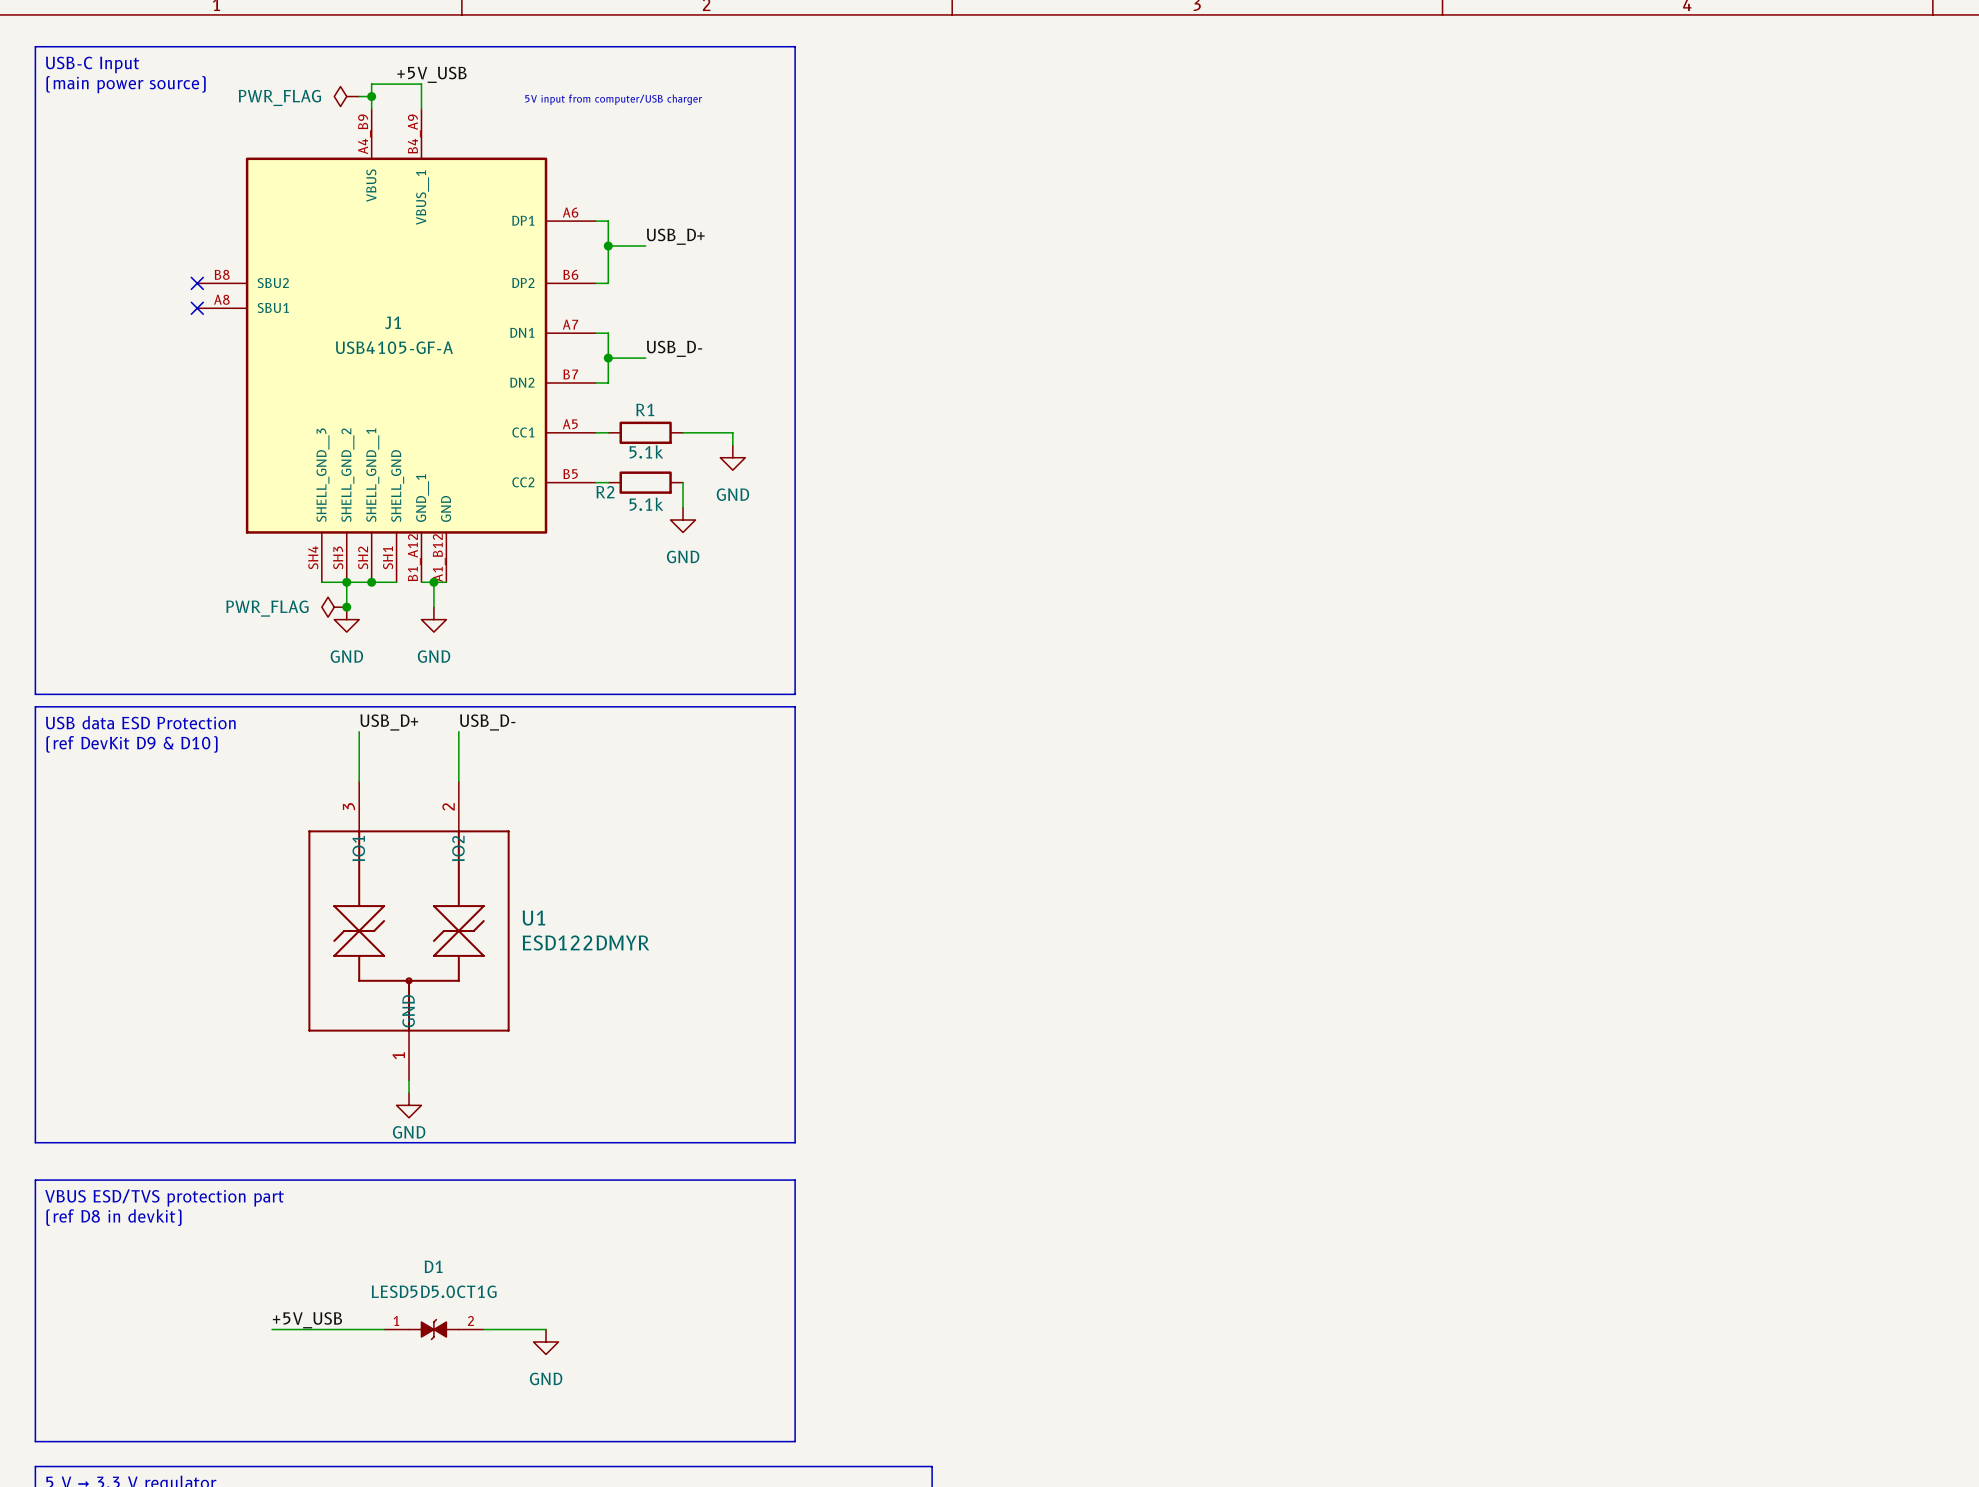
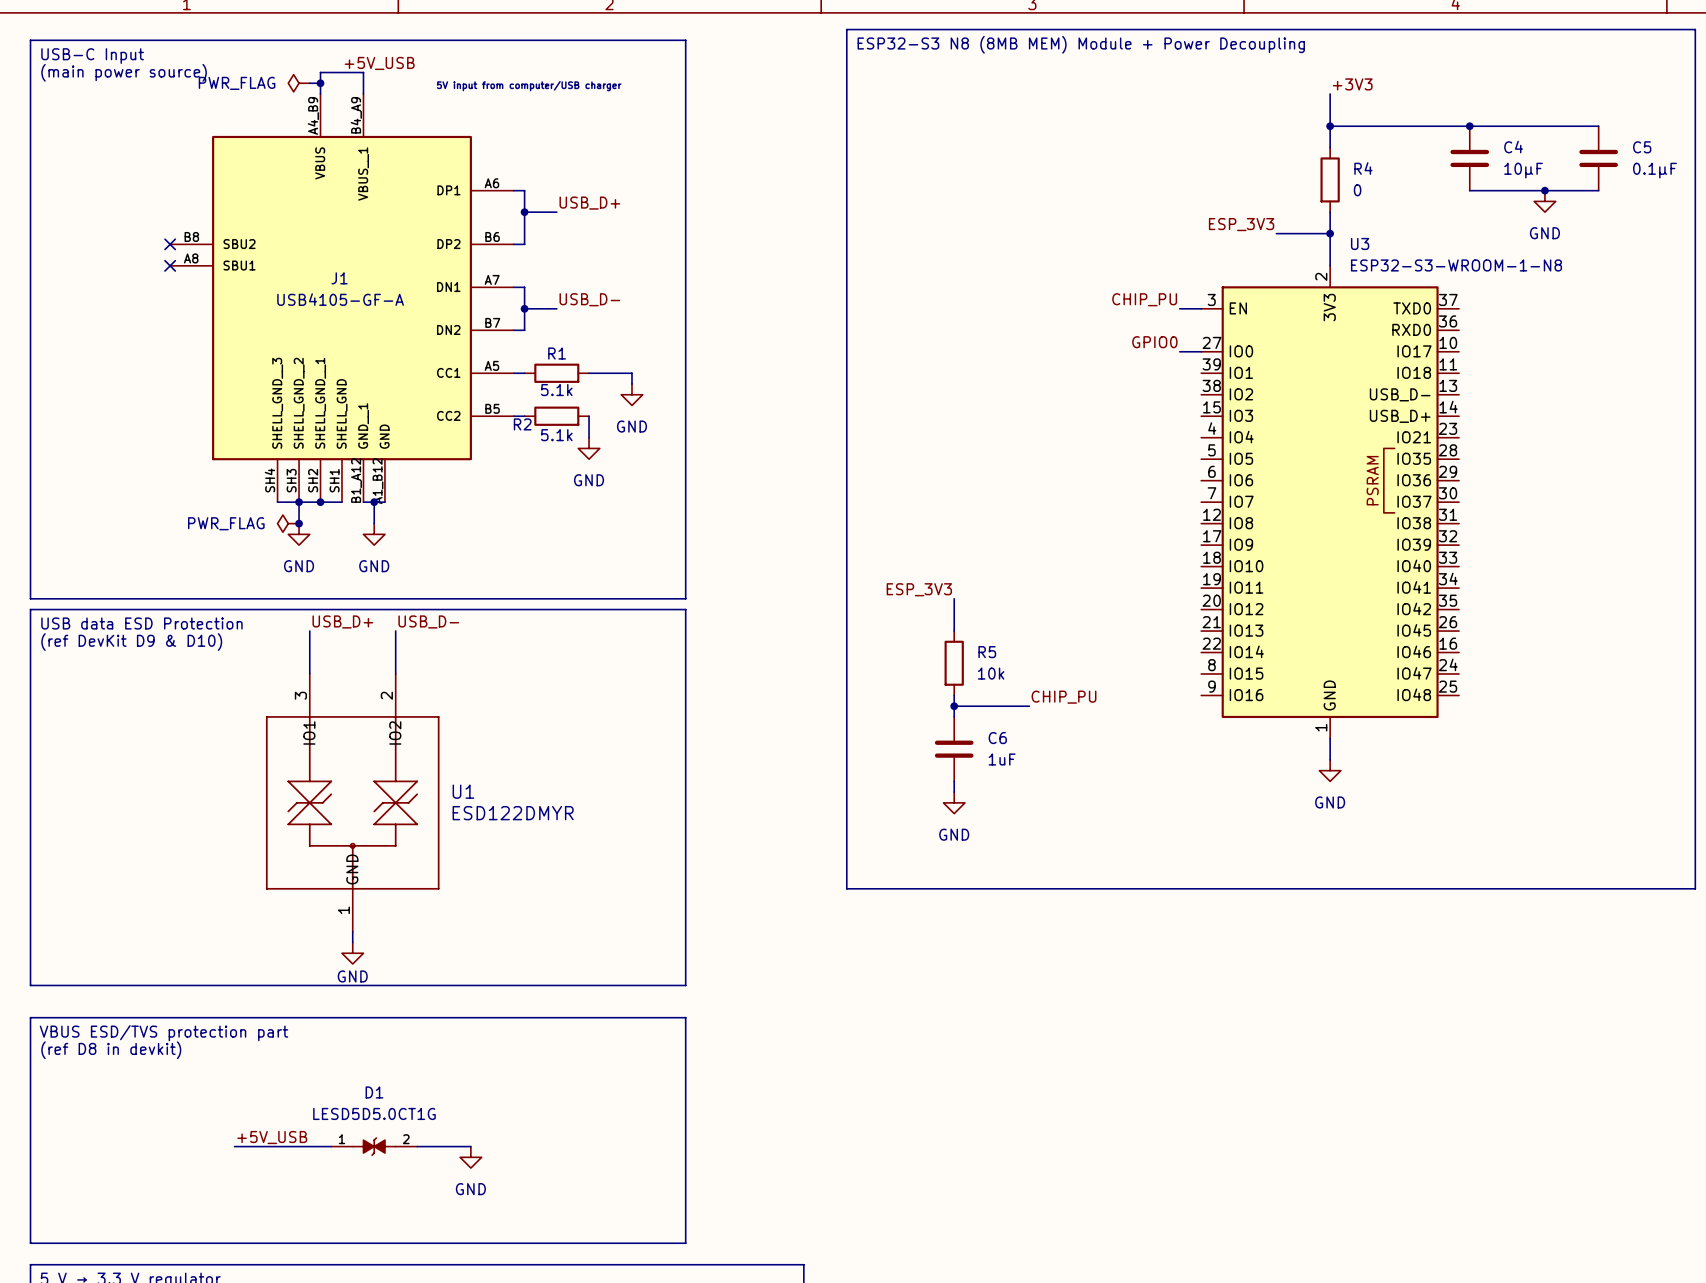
line: none -> (846, 29) (1695, 29) (1695, 888) (846, 888) (846, 29)
text: none -> ESP32-S3 N8 (8MB MEM) Module + Power Decoupling (1081, 44)
label: none -> +3V3 (1352, 84)
wire: none -> (1330, 94) (1330, 147)
wire: none -> (1330, 126) (1598, 126)
junction: none -> (1330, 126)
junction: none -> (1469, 126)
C4: none -> 10µF (1469, 158)
C5: none -> 0.1µF (1598, 158)
R4: none -> 0 (1330, 179)
wire: none -> (1469, 190) (1598, 190)
junction: none -> (1544, 190)
power symbol: none -> GND (1544, 201)
wire: none -> (1330, 212) (1330, 265)
label: none -> ESP_3V3 (1241, 224)
wire: none -> (1276, 233) (1330, 233)
junction: none -> (1330, 233)
label: none -> CHIP_PU (1144, 299)
wire: none -> (1179, 308) (1201, 308)
label: none -> GPIO0 (1154, 342)
wire: none -> (1179, 351) (1201, 351)
U3: none -> ESP32-S3-WROOM-1-N8 (1330, 502)
label: none -> ESP_3V3 (919, 589)
wire: none -> (954, 598) (954, 631)
R5: none -> 10k (954, 663)
wire: none -> (954, 695) (954, 716)
label: none -> CHIP_PU (1064, 697)
wire: none -> (954, 706) (1029, 706)
junction: none -> (954, 706)
wire: none -> (1330, 738) (1330, 759)
C6: none -> 1uF (954, 749)
power symbol: none -> GND (1330, 770)
wire: none -> (954, 781) (954, 792)
power symbol: none -> GND (954, 802)

